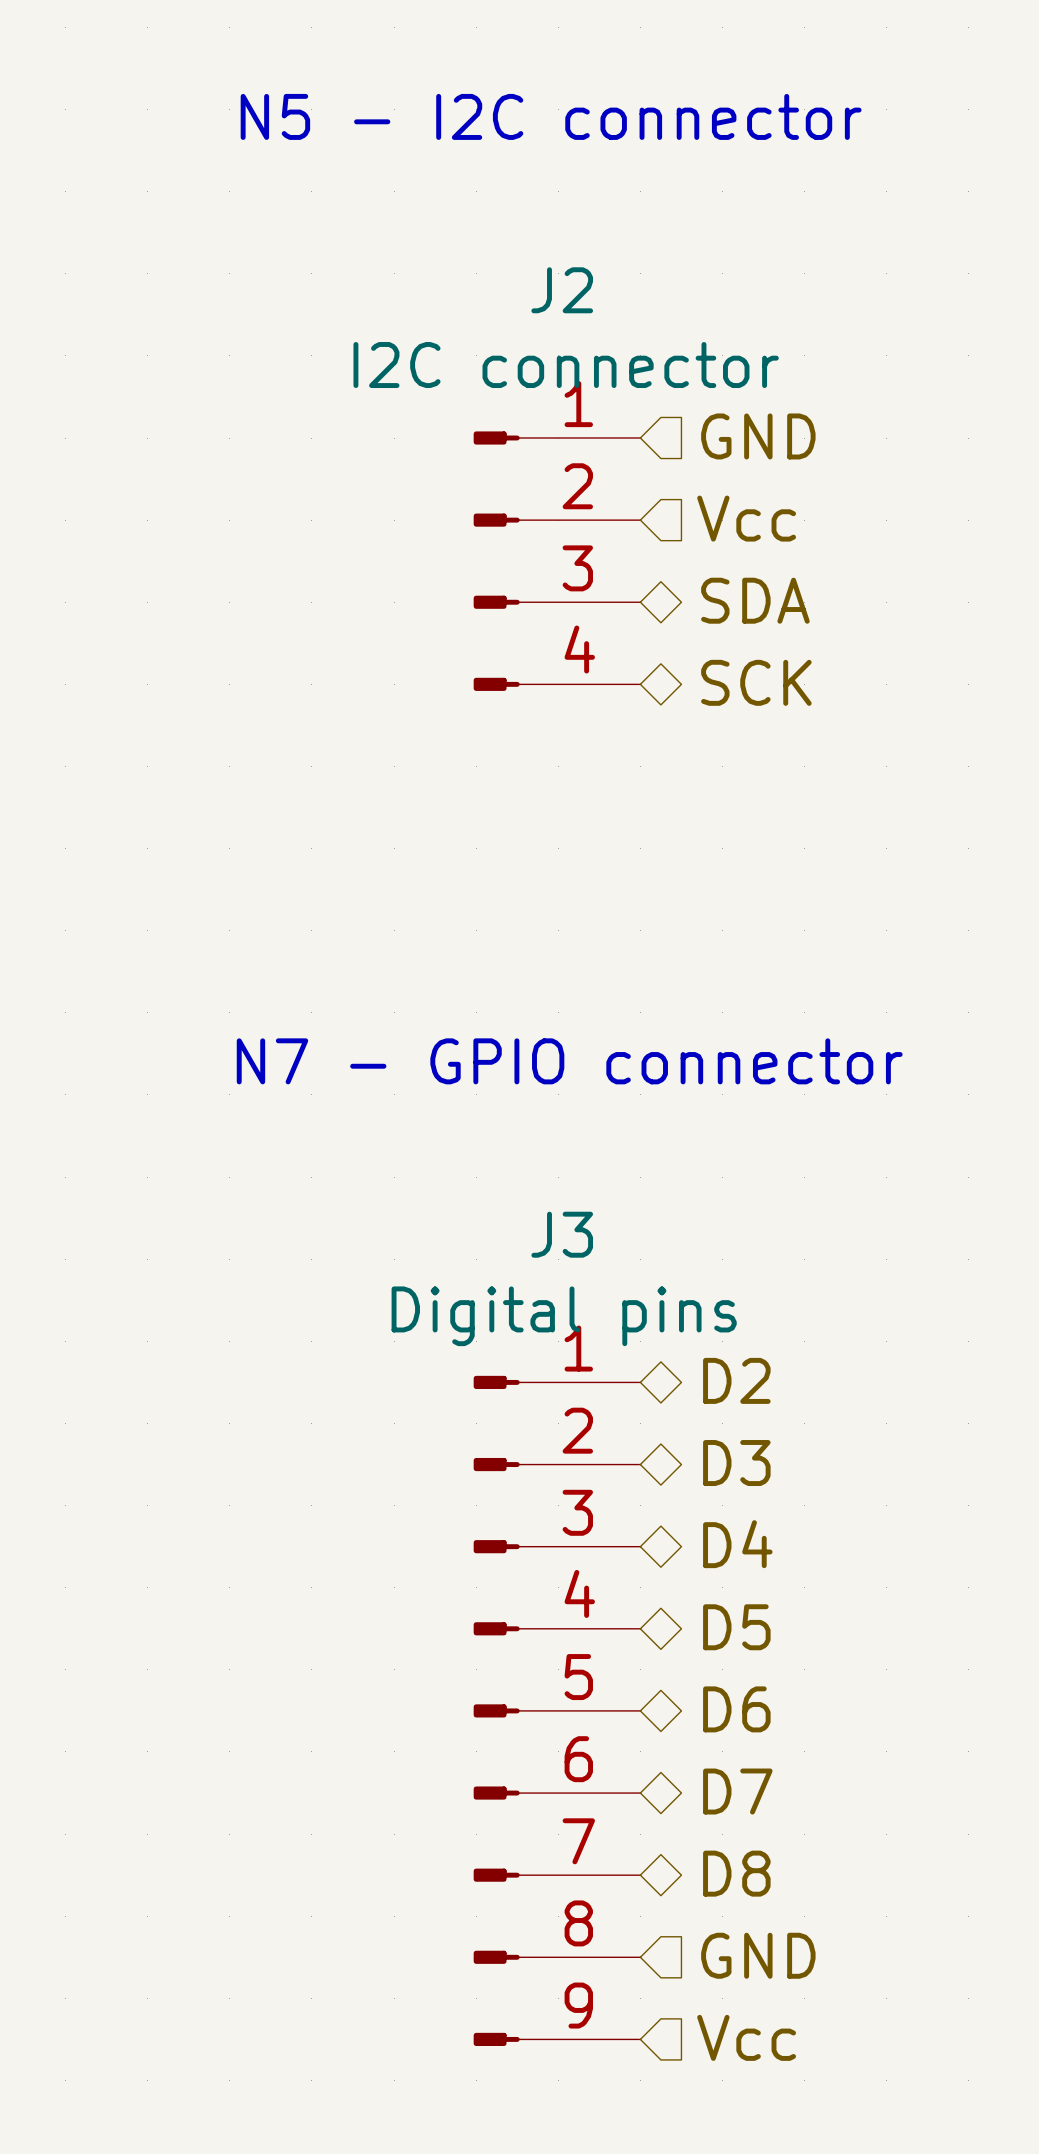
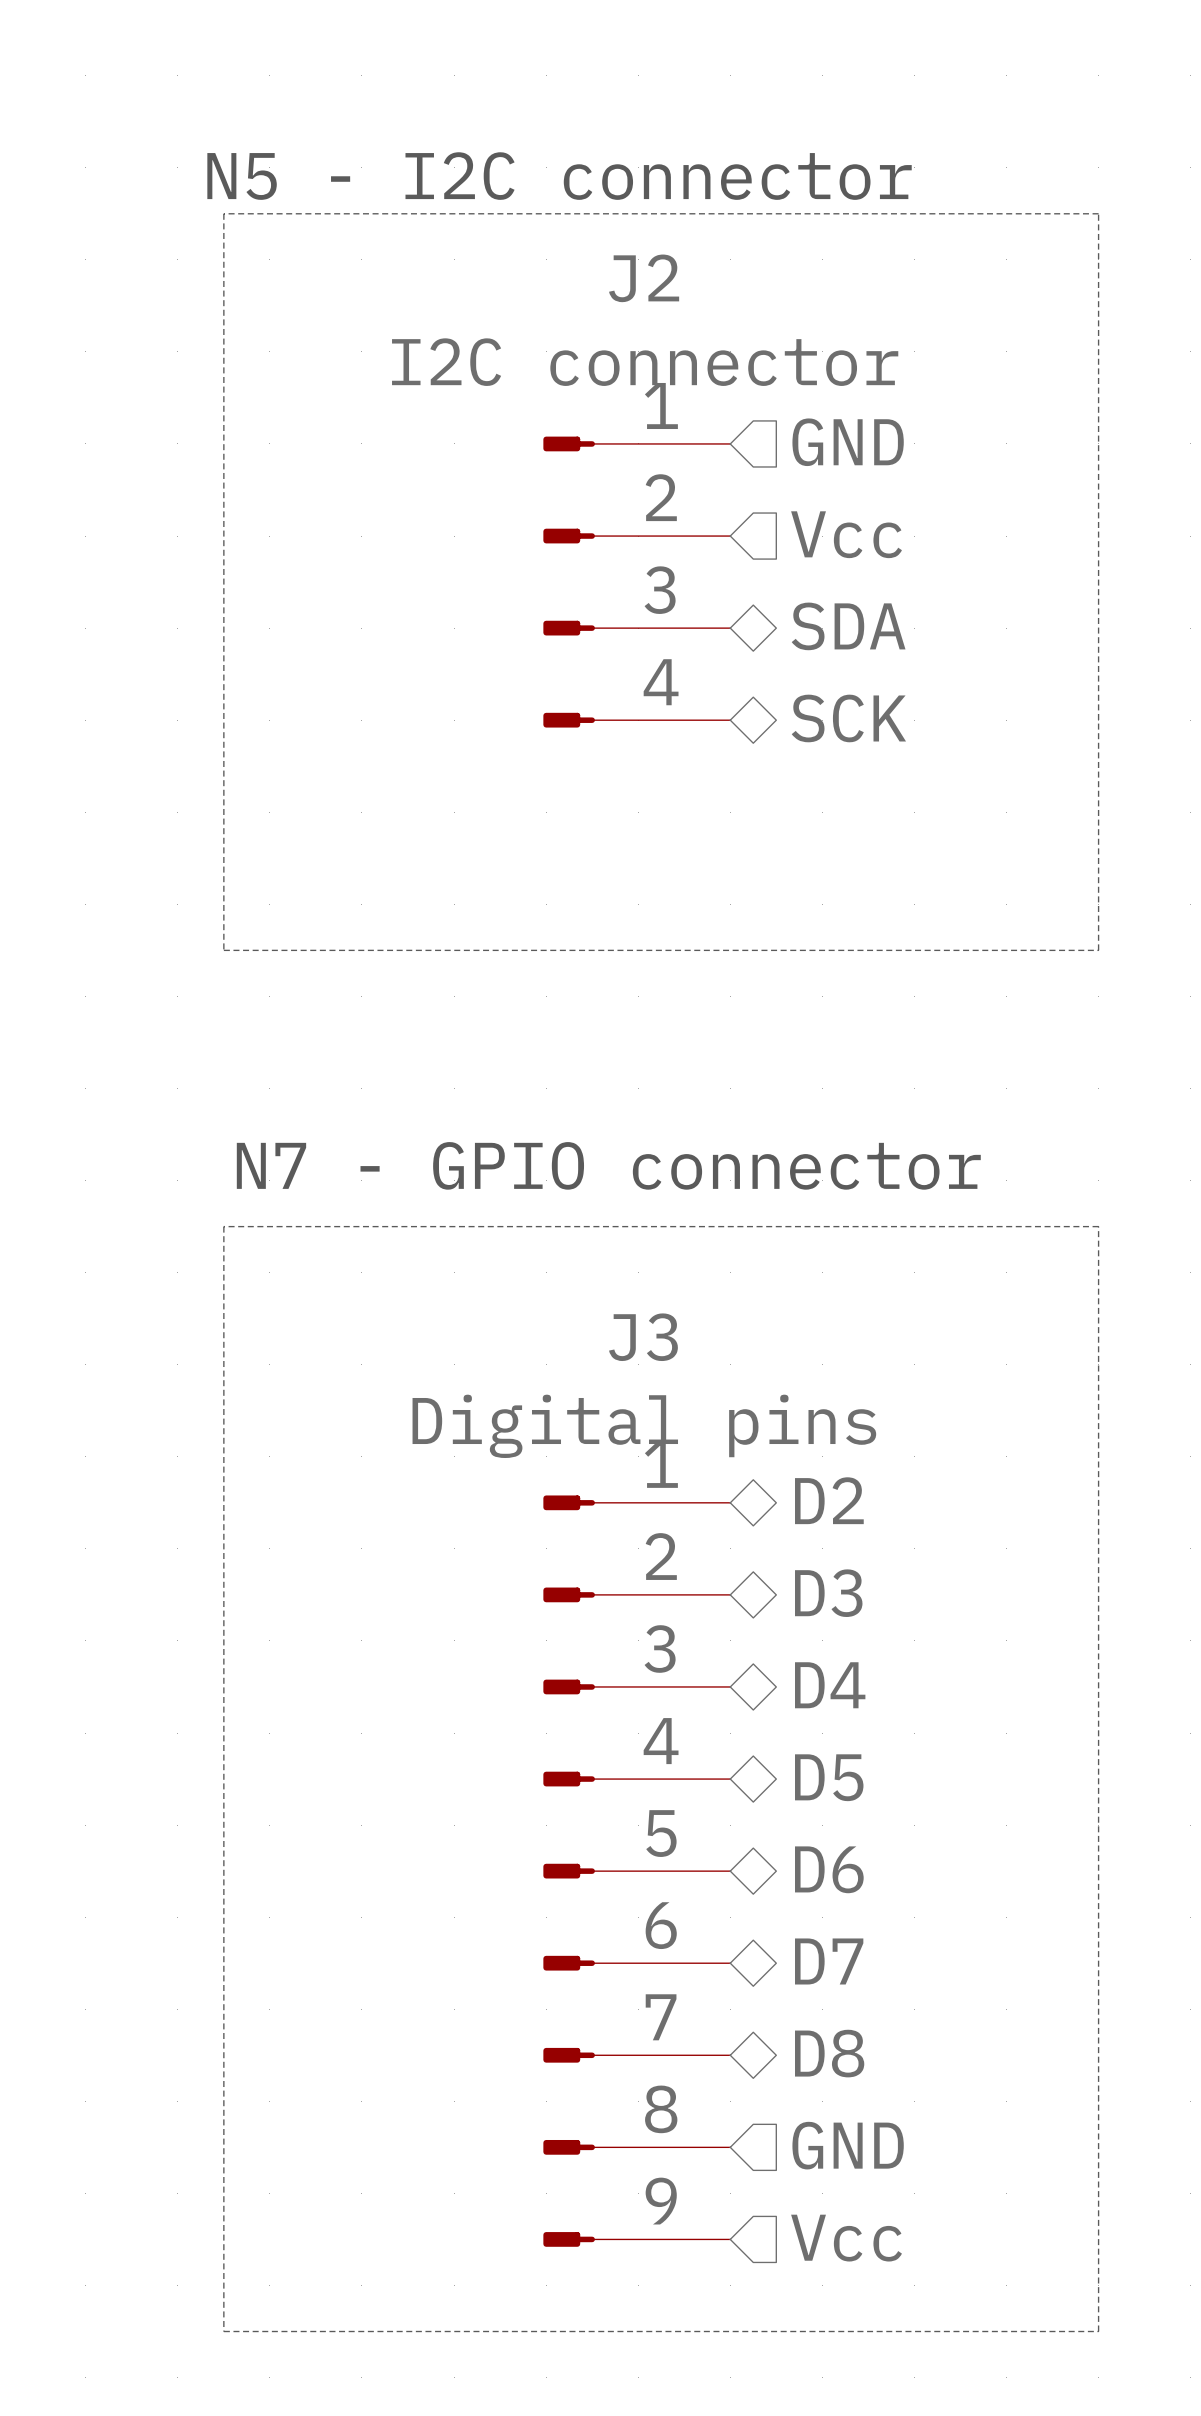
text position: N5 - I2C connector (551, 116) -> N5 - I2C connector (559, 176)
line: none -> (223, 213) (223, 950) (1098, 950) (1098, 213) (223, 213)
text position: N7 - GPIO connector (569, 1061) -> N7 - GPIO connector (608, 1165)
line: none -> (223, 1226) (223, 2331) (1098, 2331) (1098, 1226) (223, 1226)

